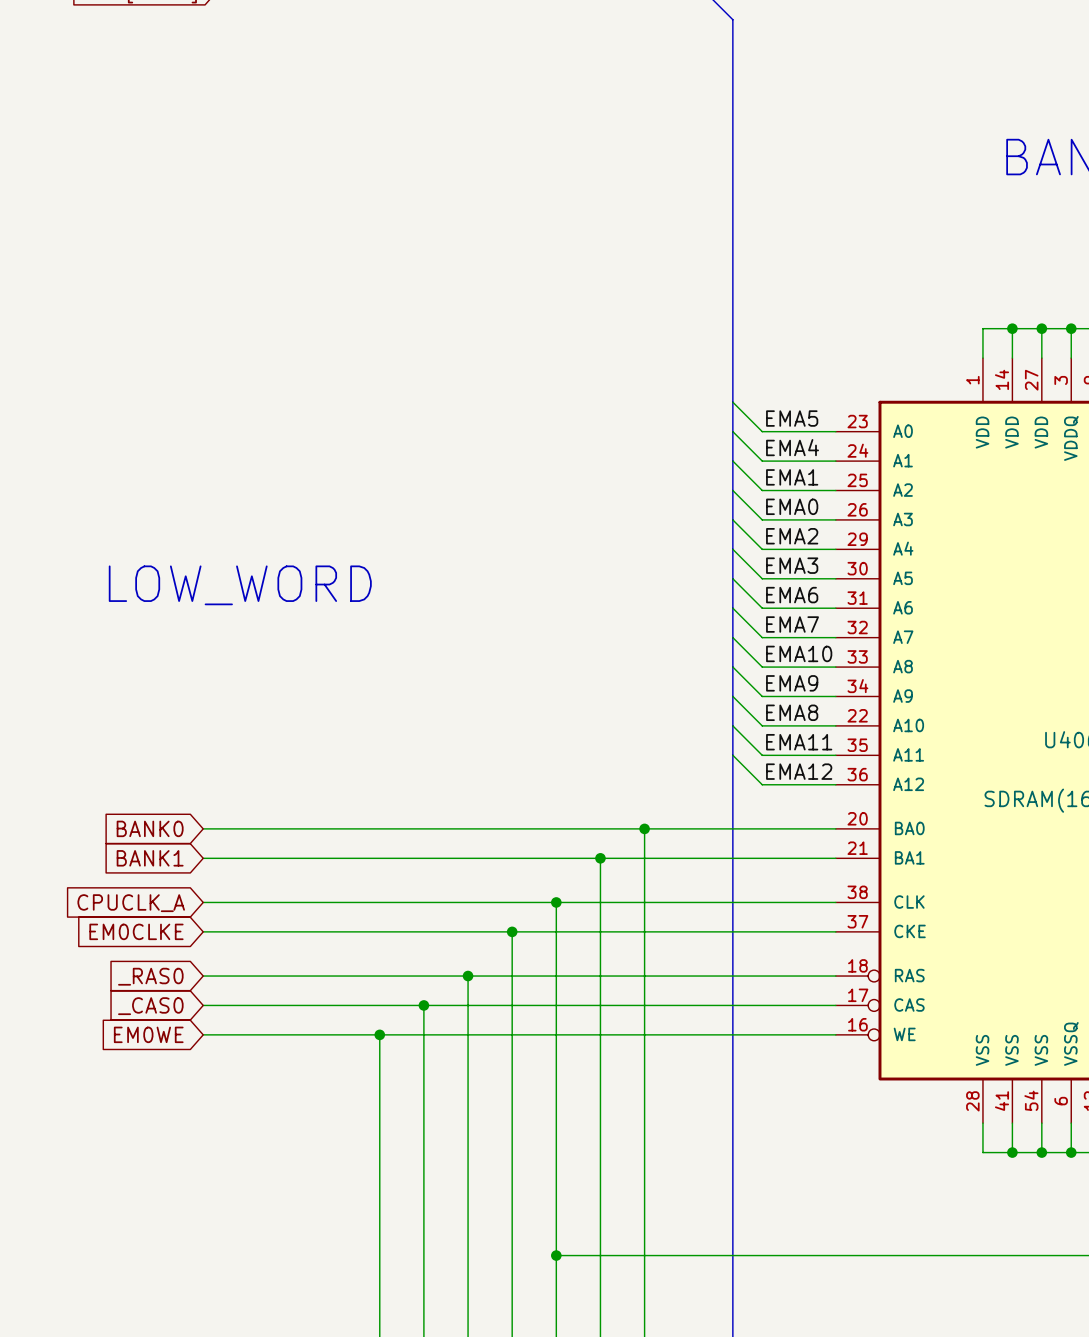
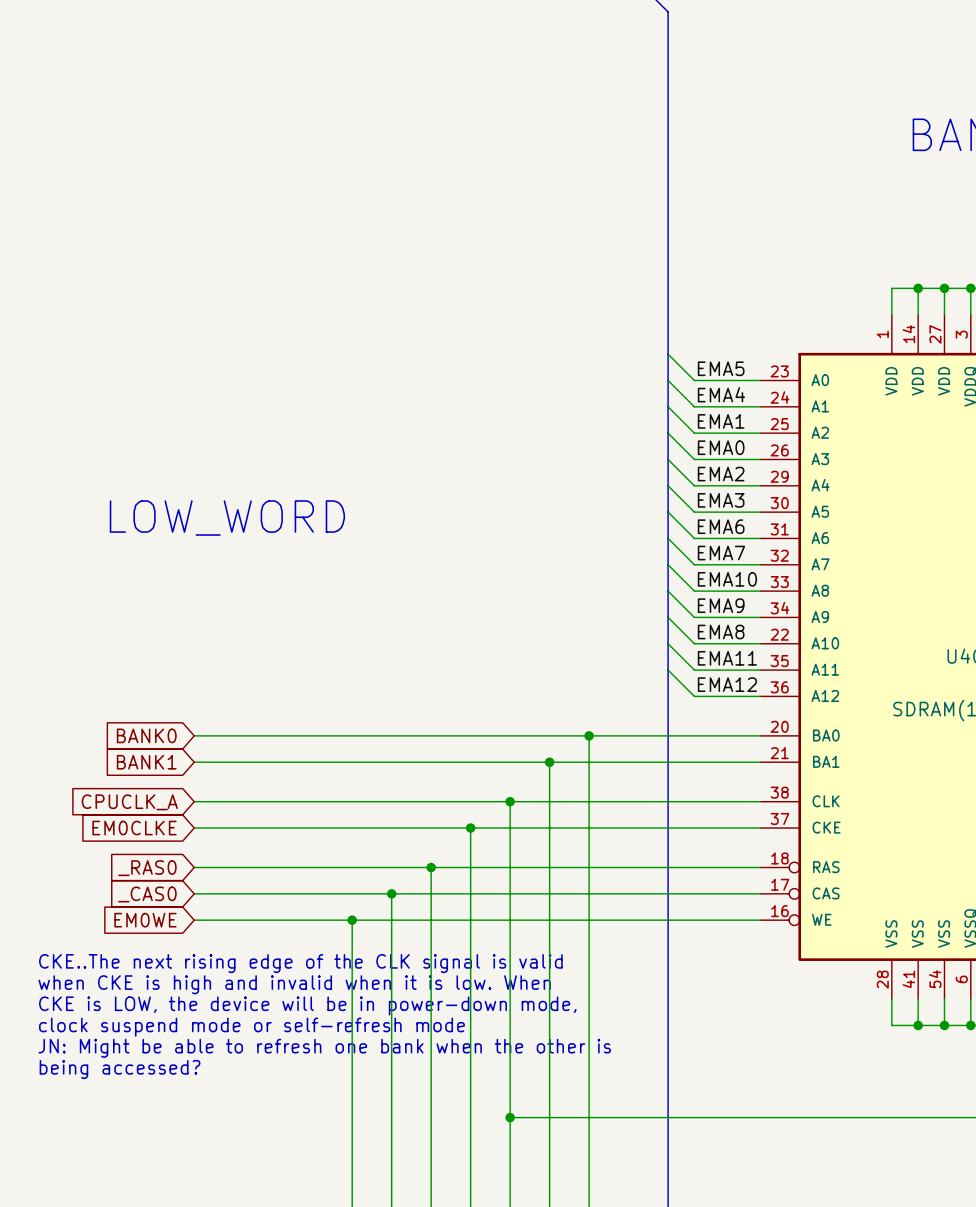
text: none -> CKE..The next rising edge of the CLK signal is valid (300, 963)
text: none -> when CKE is high and invalid when it is low. When (294, 984)
text: none -> CKE is LOW, the device will be in power-down mode, (307, 1005)
text: none -> clock suspend mode or self-refresh mode (251, 1027)
text: none -> JN: Might be able to refresh one bank when the other is (324, 1048)
text: none -> being accessed? (120, 1069)

